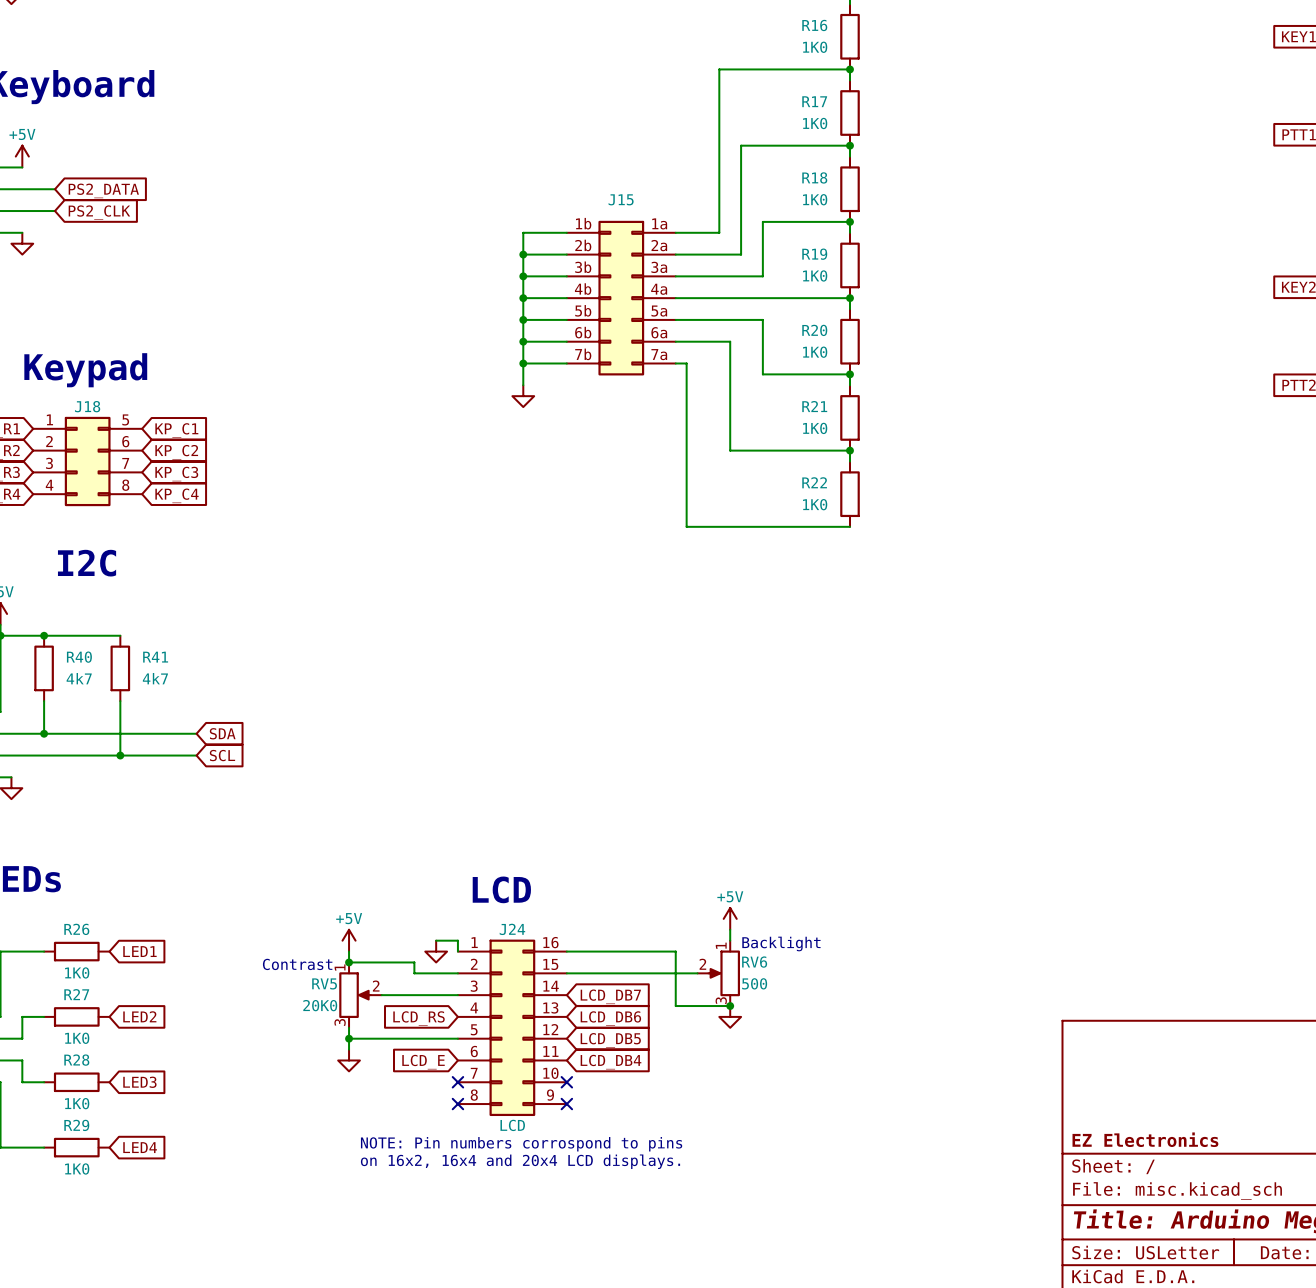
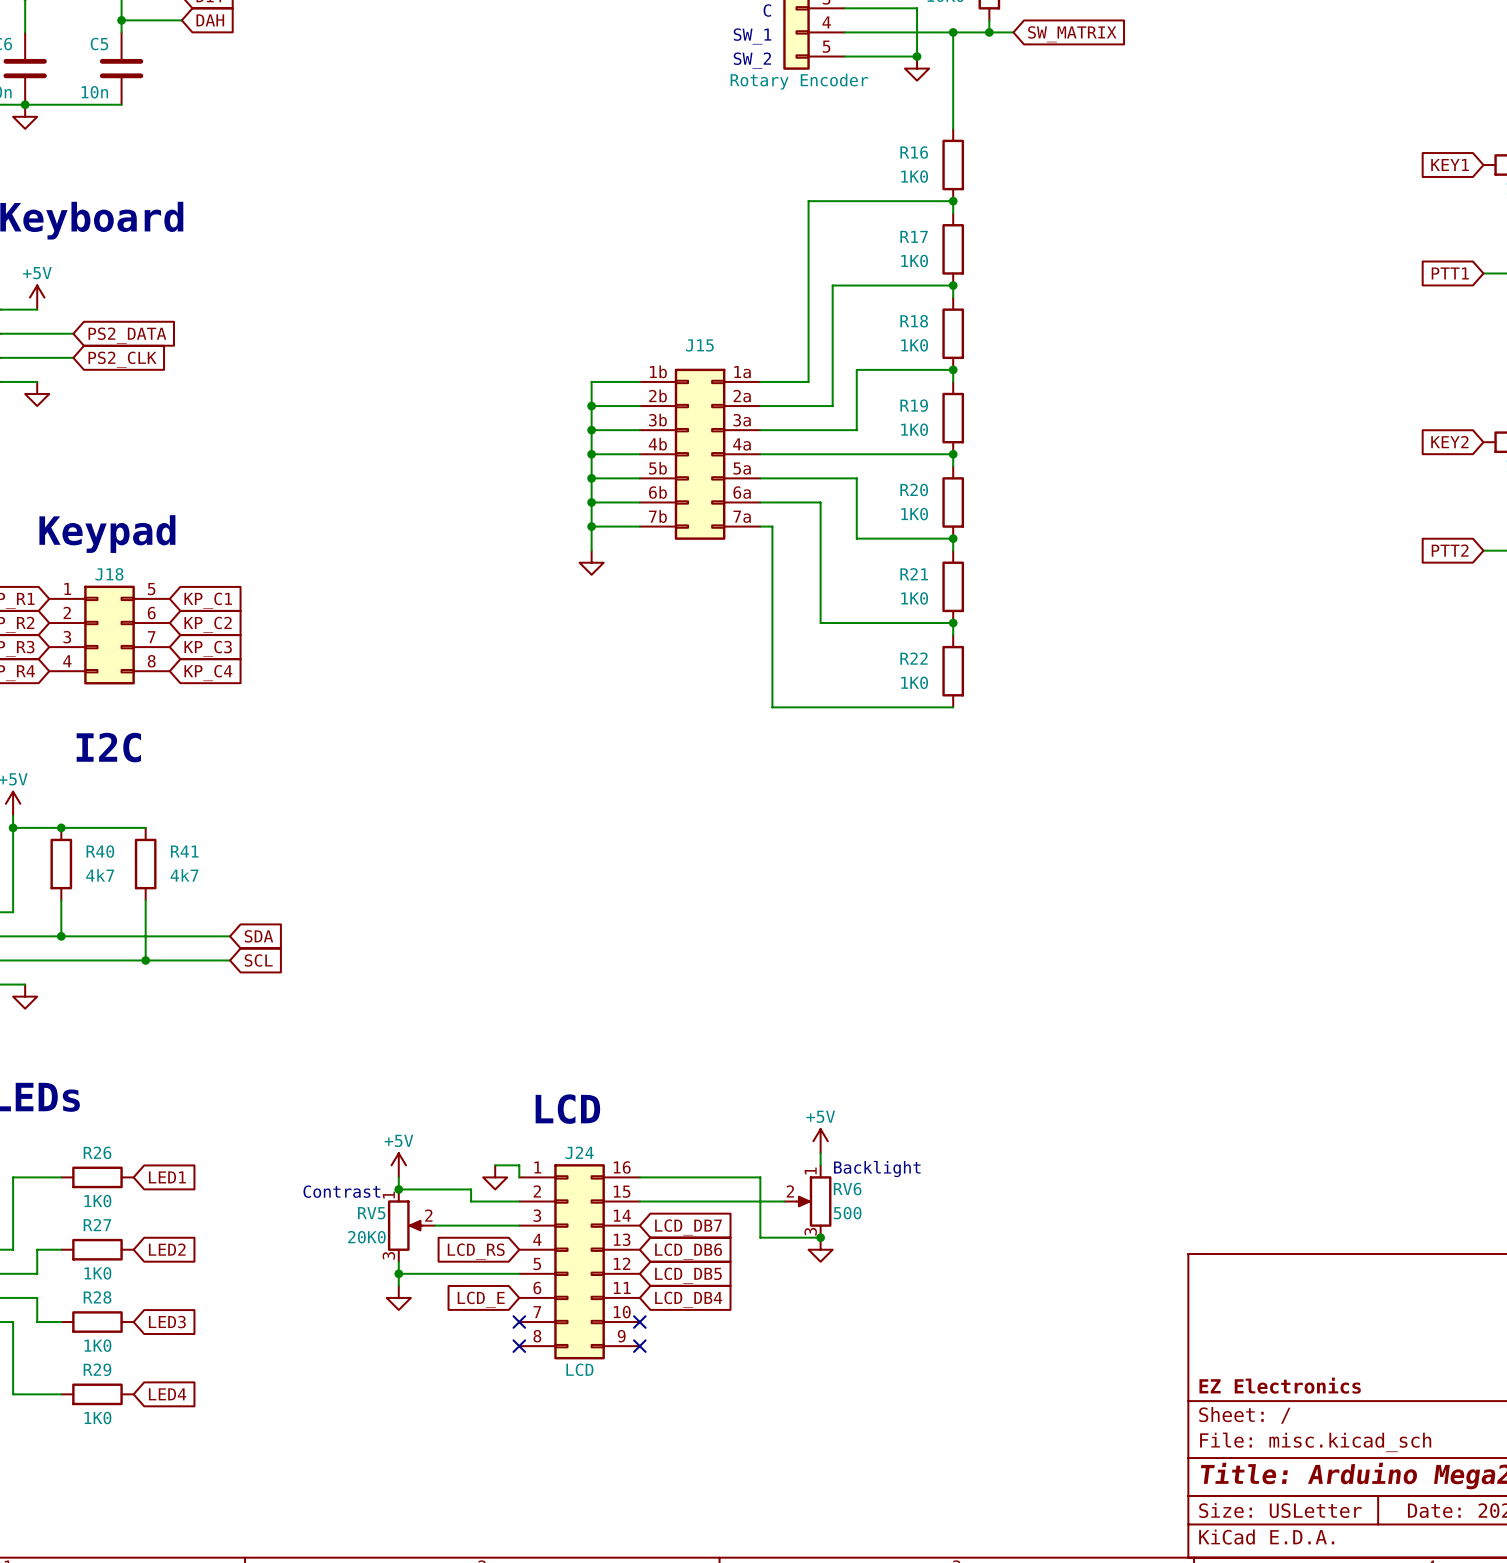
text: NOTE: Pin numbers corrospond to pins (521, 1144) -> none
text: on 16x2, 16x4 and 20x4 LCD displays. (520, 1161) -> none

